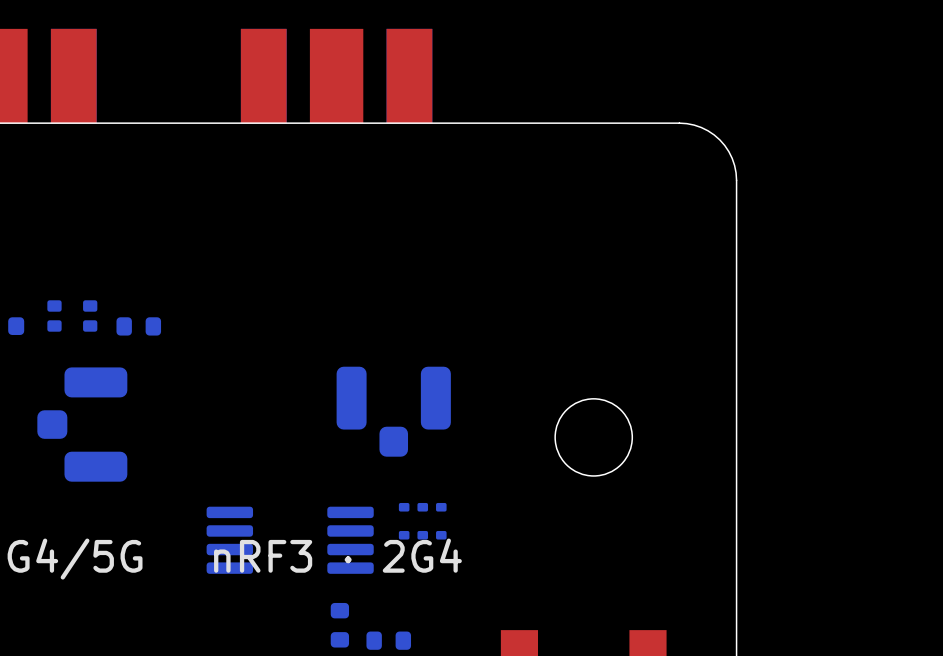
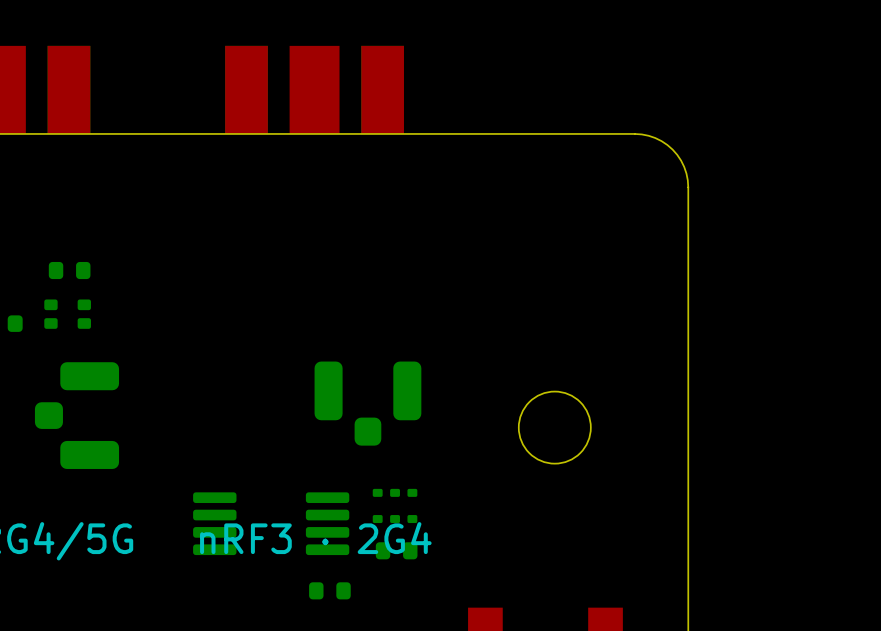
part position: (138, 326) -> (69, 270)
part: none -> (396, 550)
part rotation: 0° (339, 625) -> 90° clockwise (329, 590)
part: (388, 640) -> none

